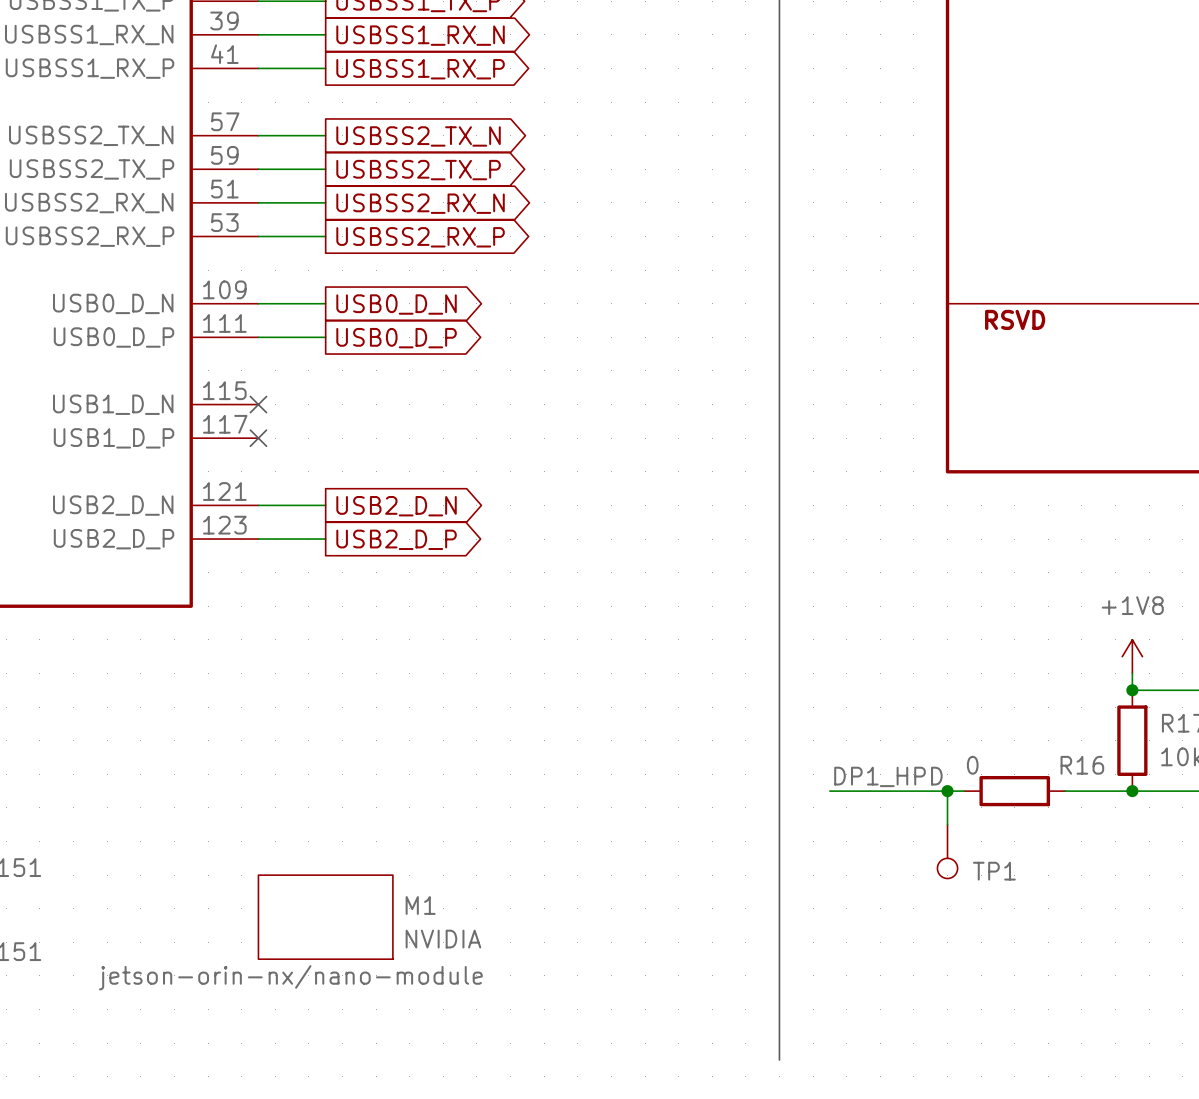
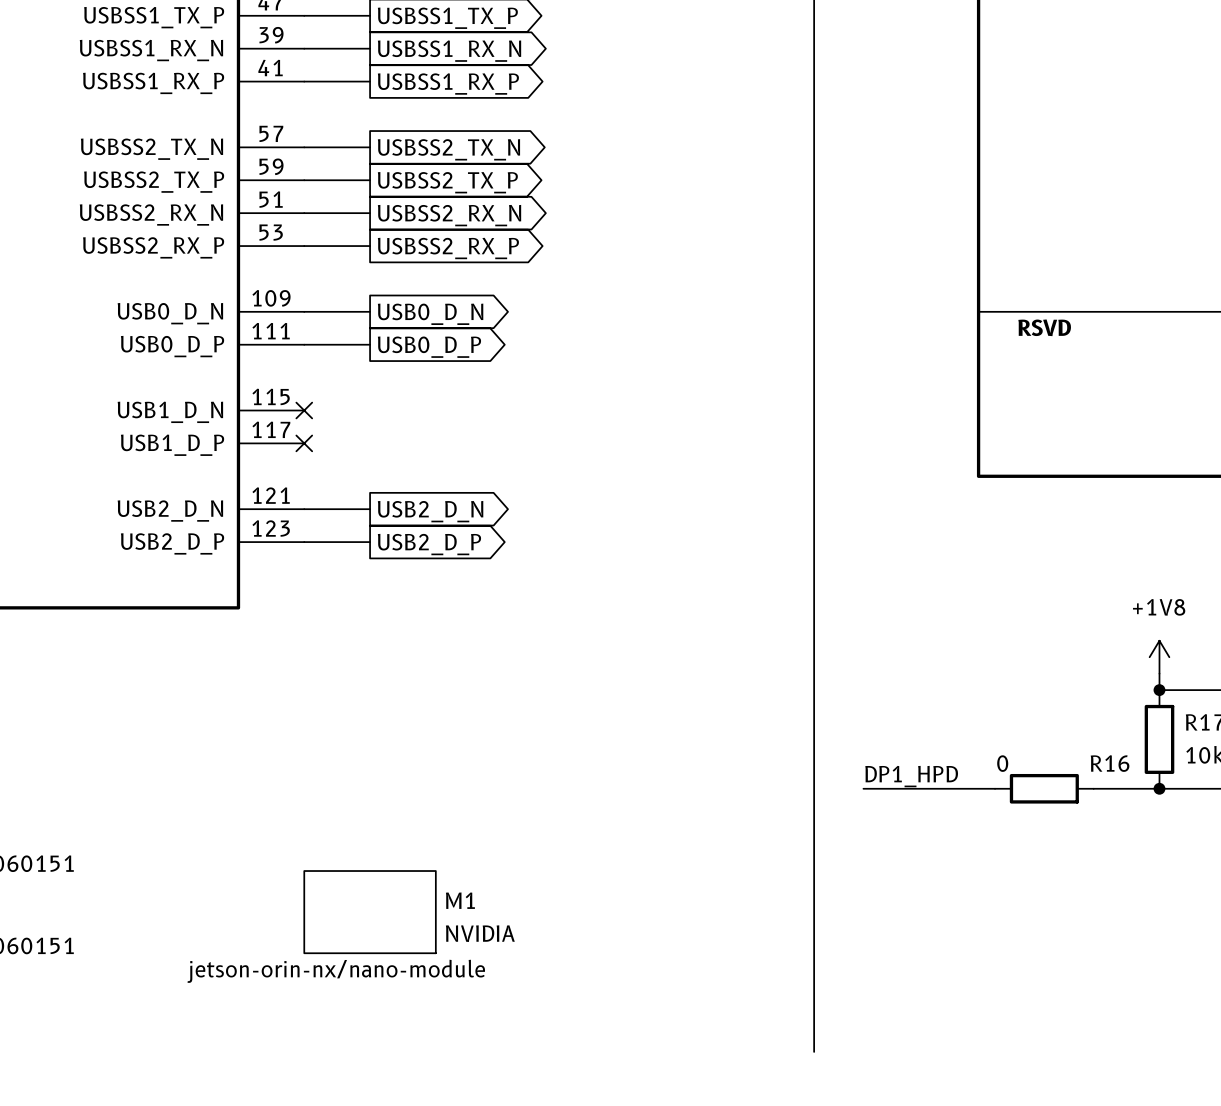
wire: (947, 791) (947, 824) -> none
junction: (947, 791) -> none
TP1: (947, 851) -> none

